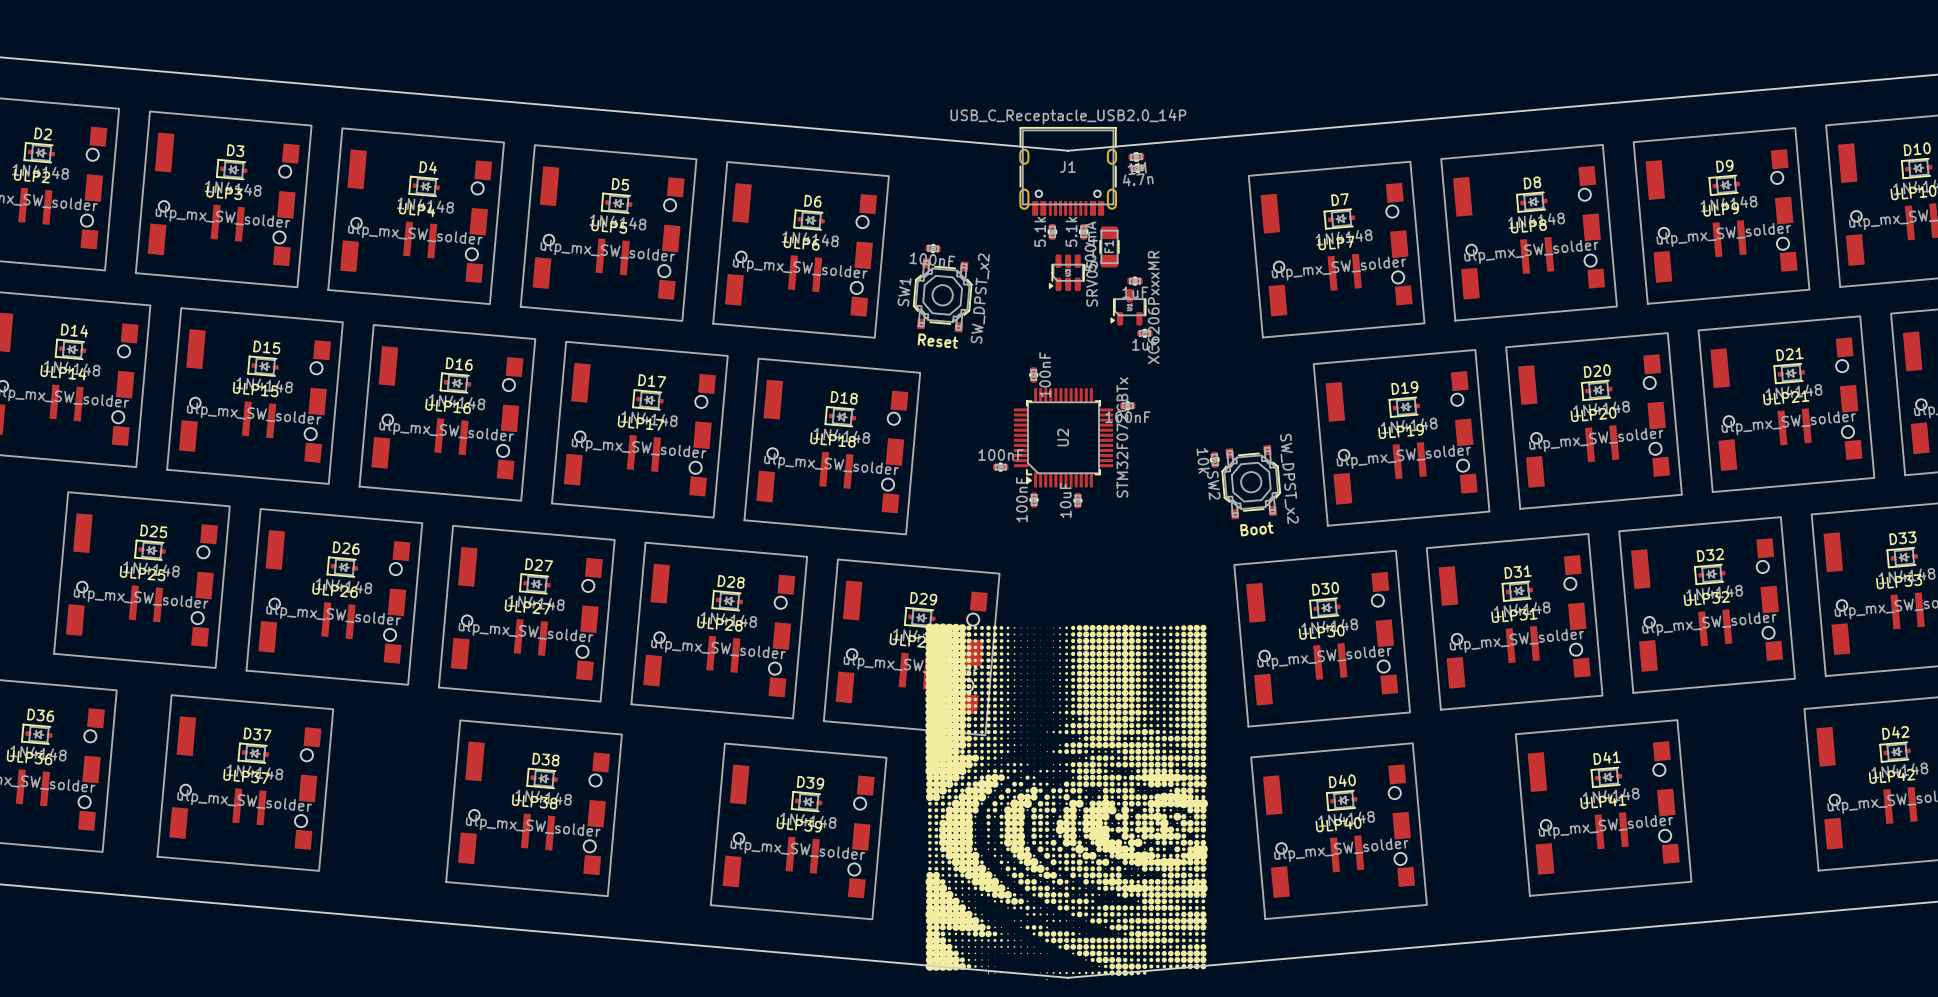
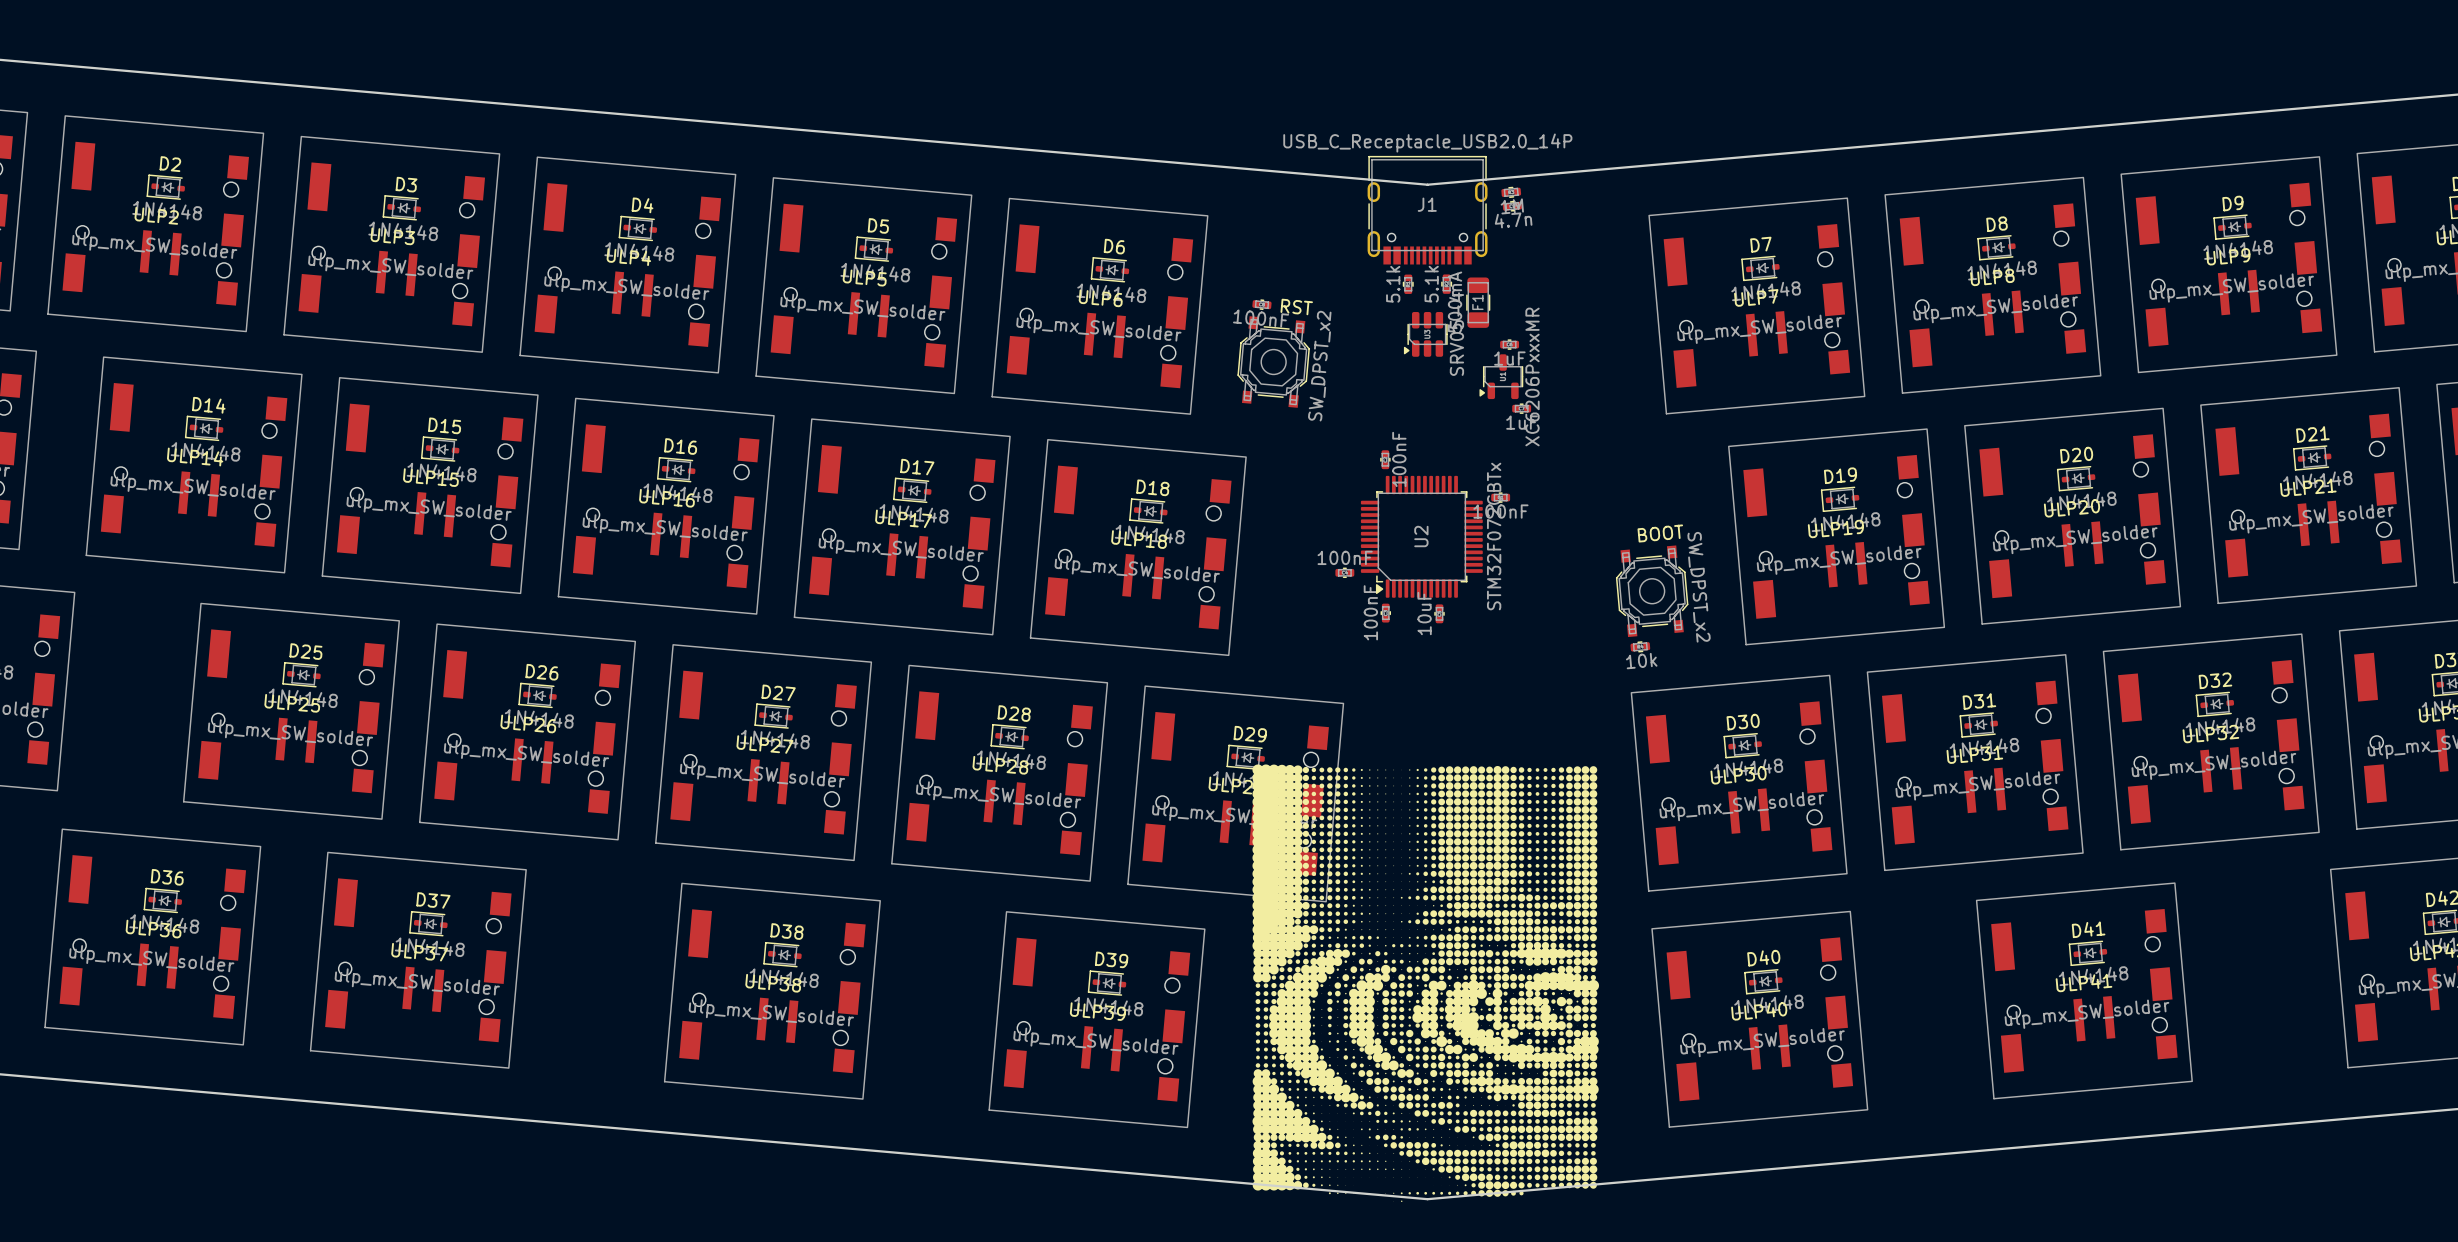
SW1 name: SW1 (904, 292) -> RST (1296, 306)
text: Reset (938, 341) -> none
part rotation: 0° (1214, 459) -> 90° clockwise (1640, 646)
part position: (1214, 459) -> (1640, 646)
SW2 name: SW2 (1213, 485) -> BOOT (1660, 533)
text: Boot (1256, 529) -> none

